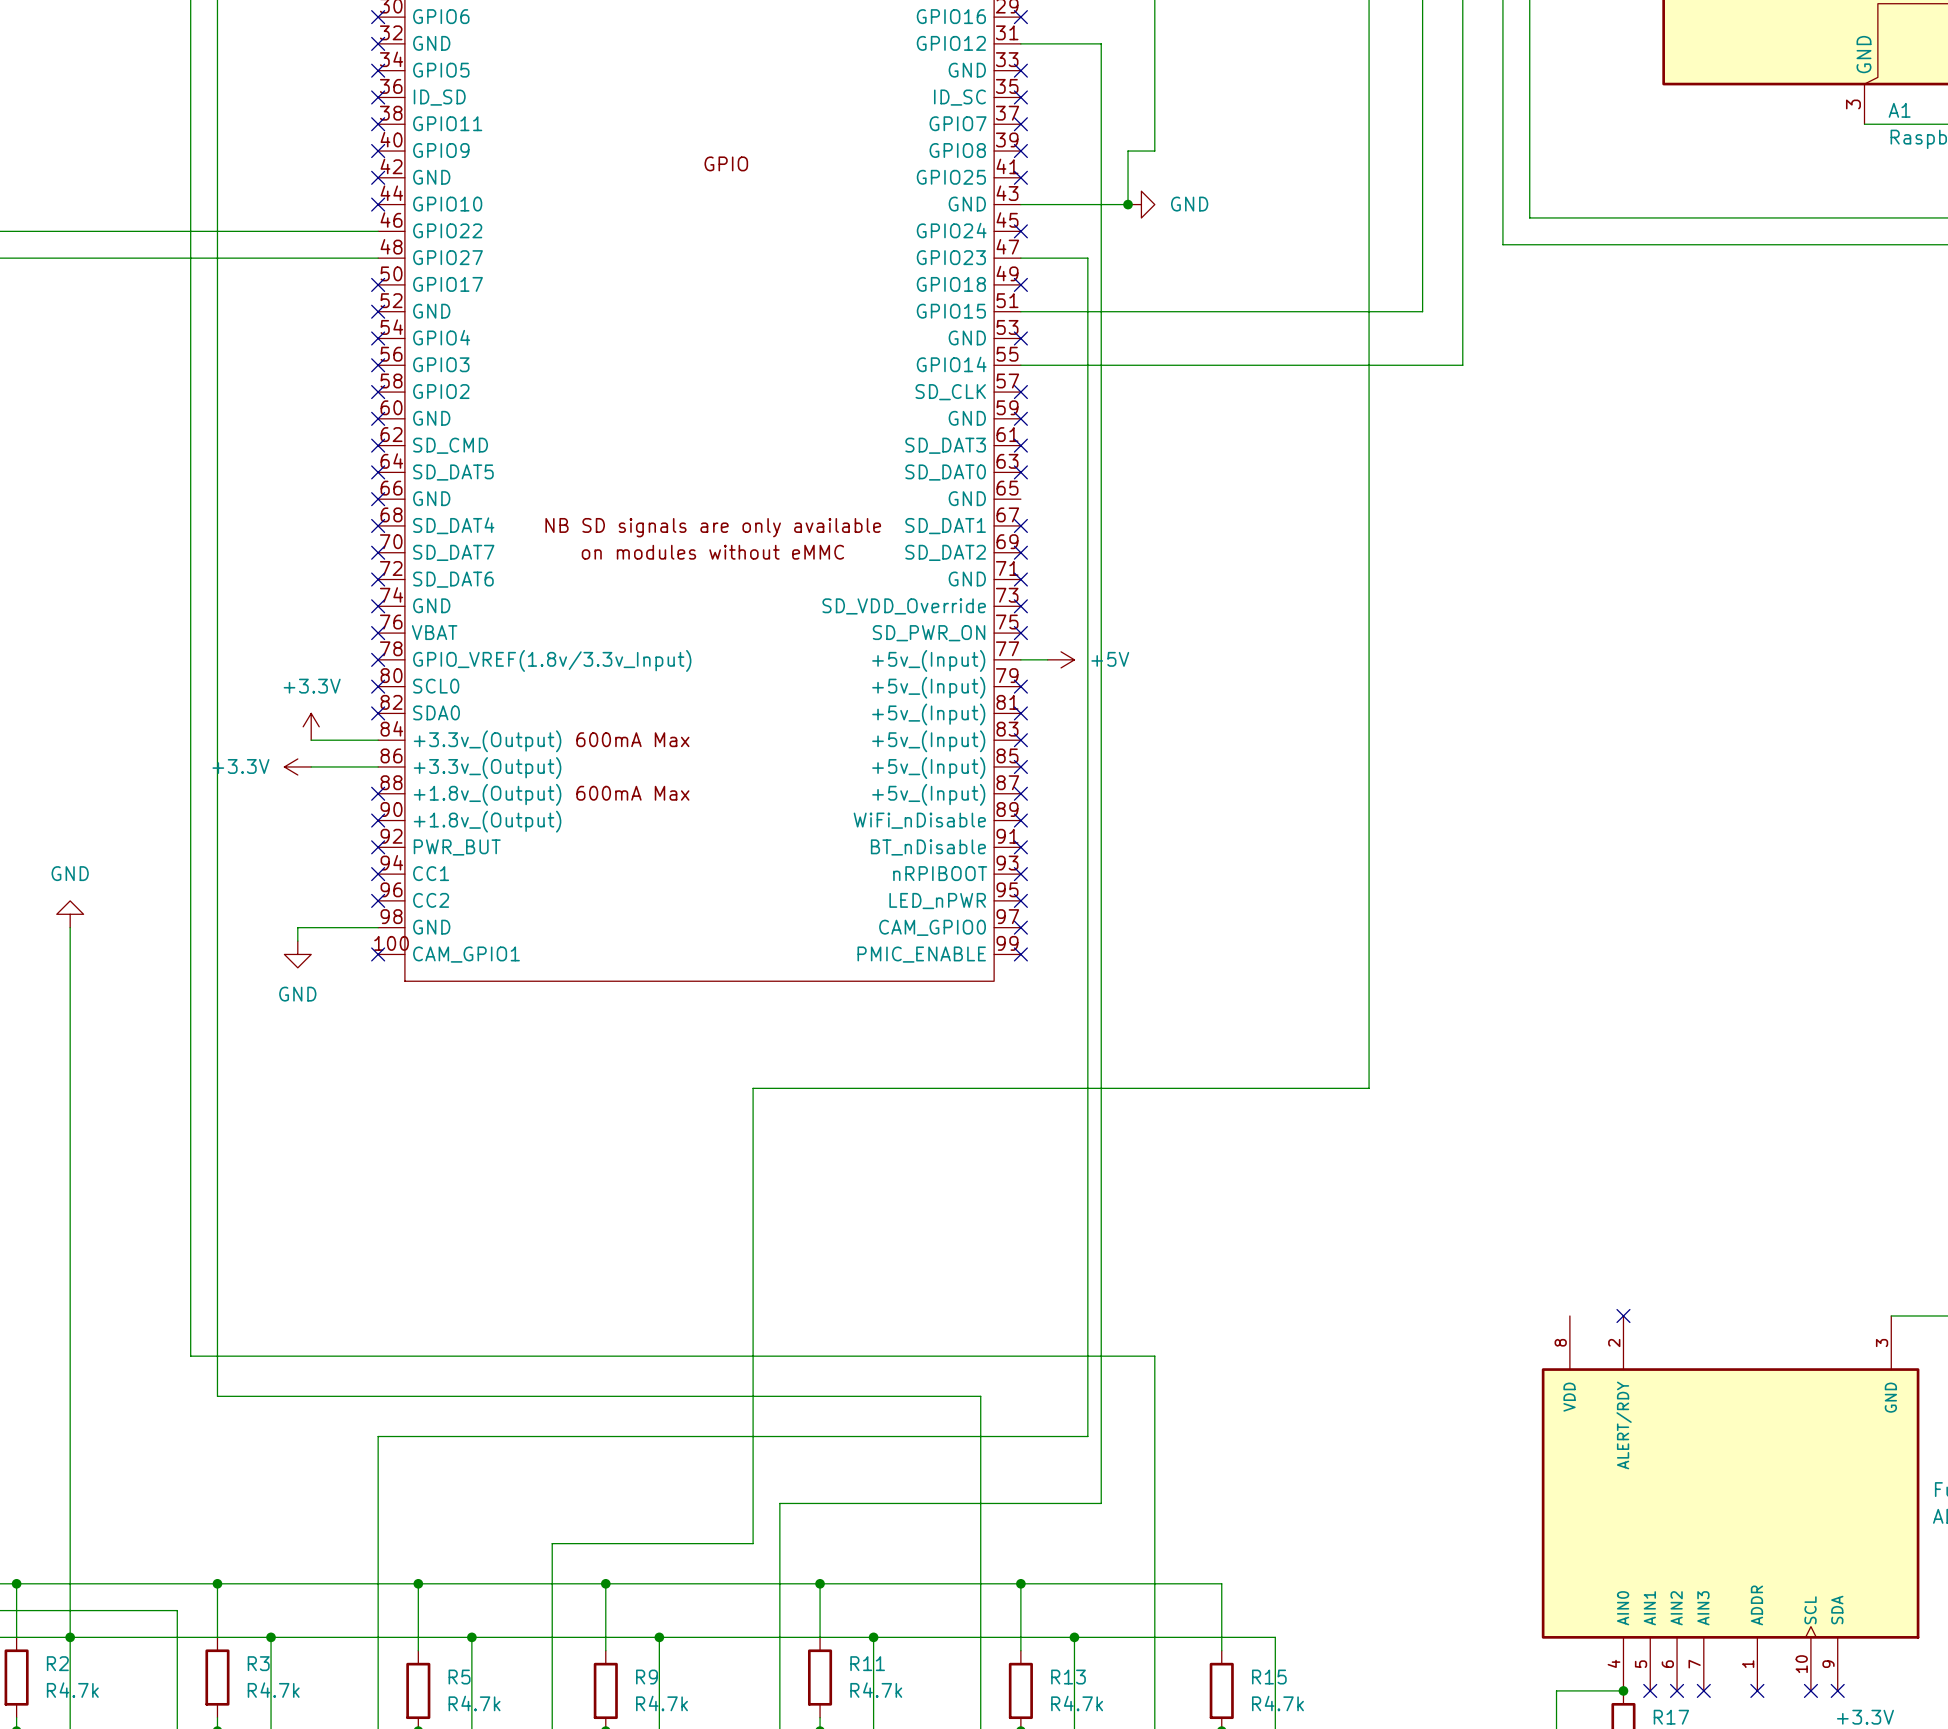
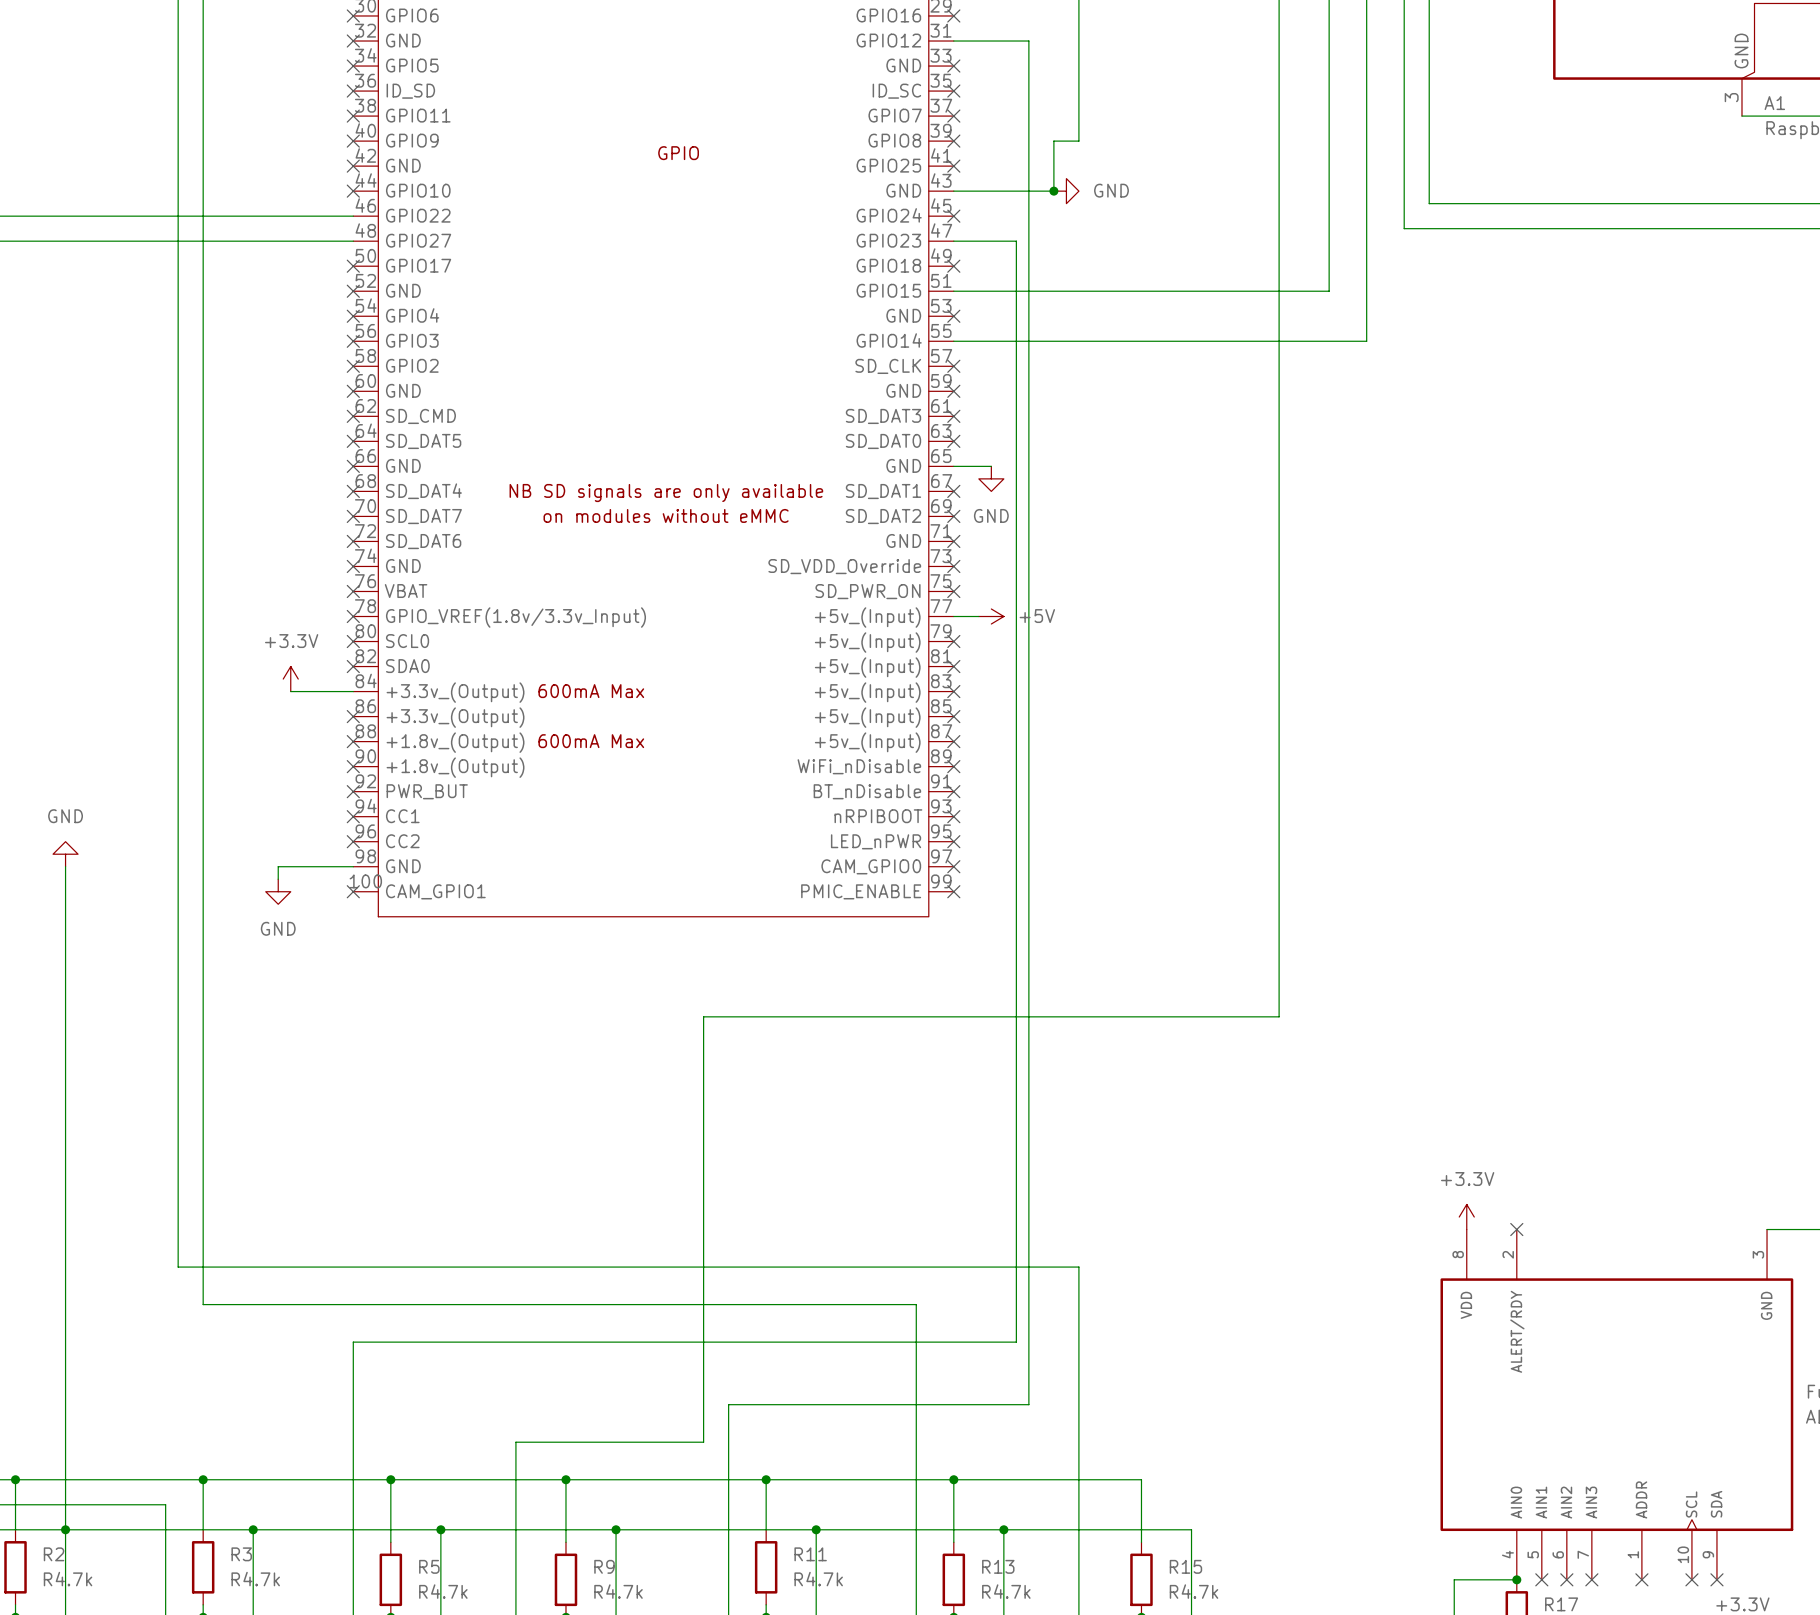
wire: none -> (953, 466) (991, 466)
power symbol: none -> GND (991, 478)
power symbol: +3.3V (297, 766) -> none
wire: (311, 766) (378, 766) -> none
no-connect mark: none -> (353, 716)
power symbol: none -> +3.3V (1466, 1217)

